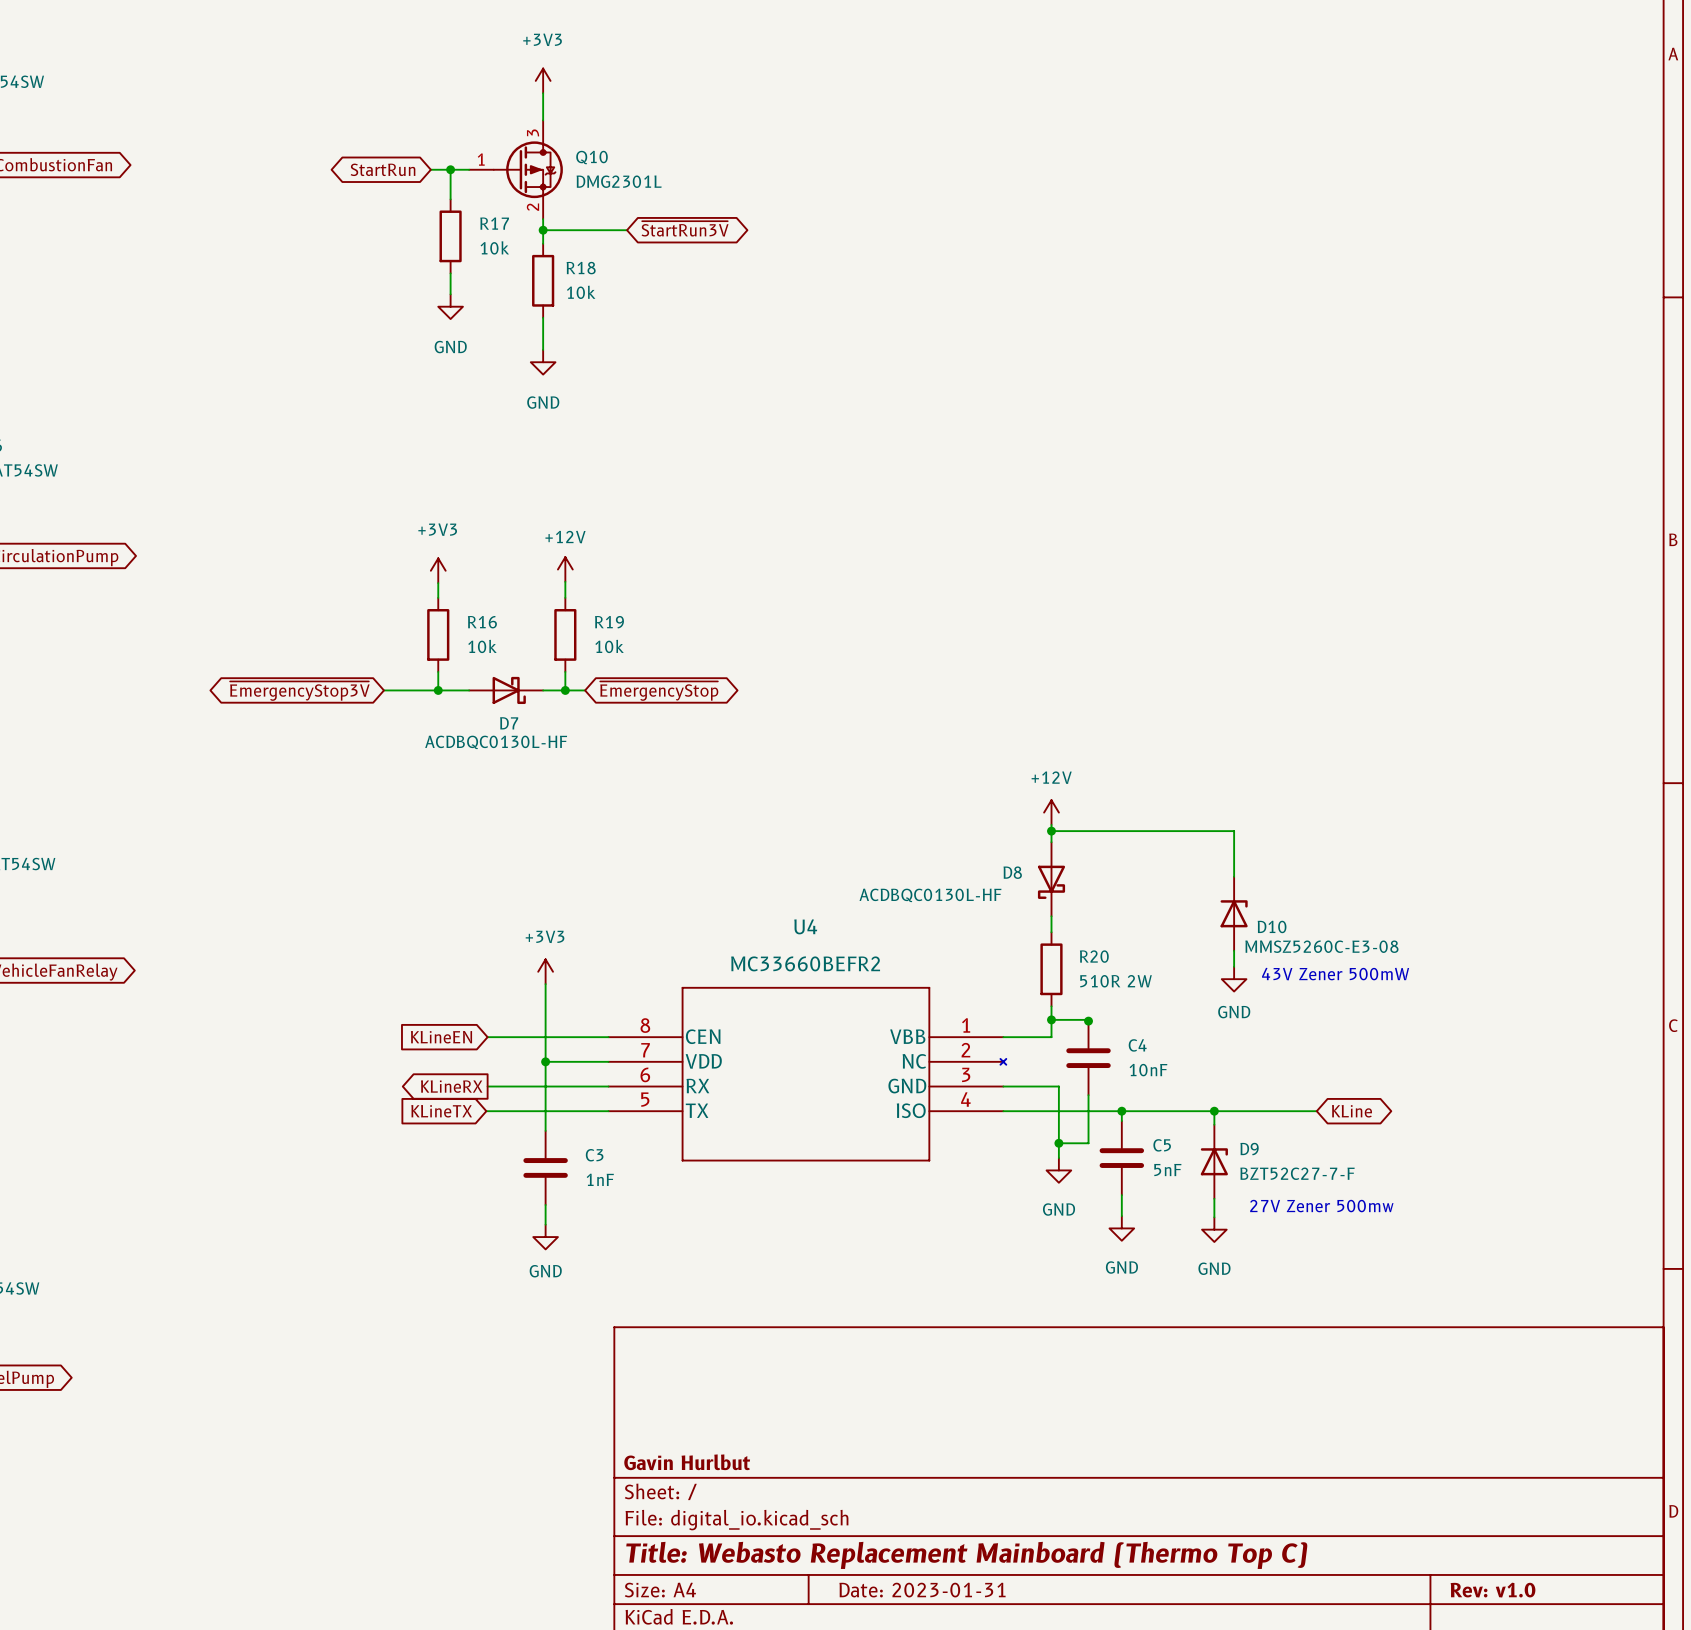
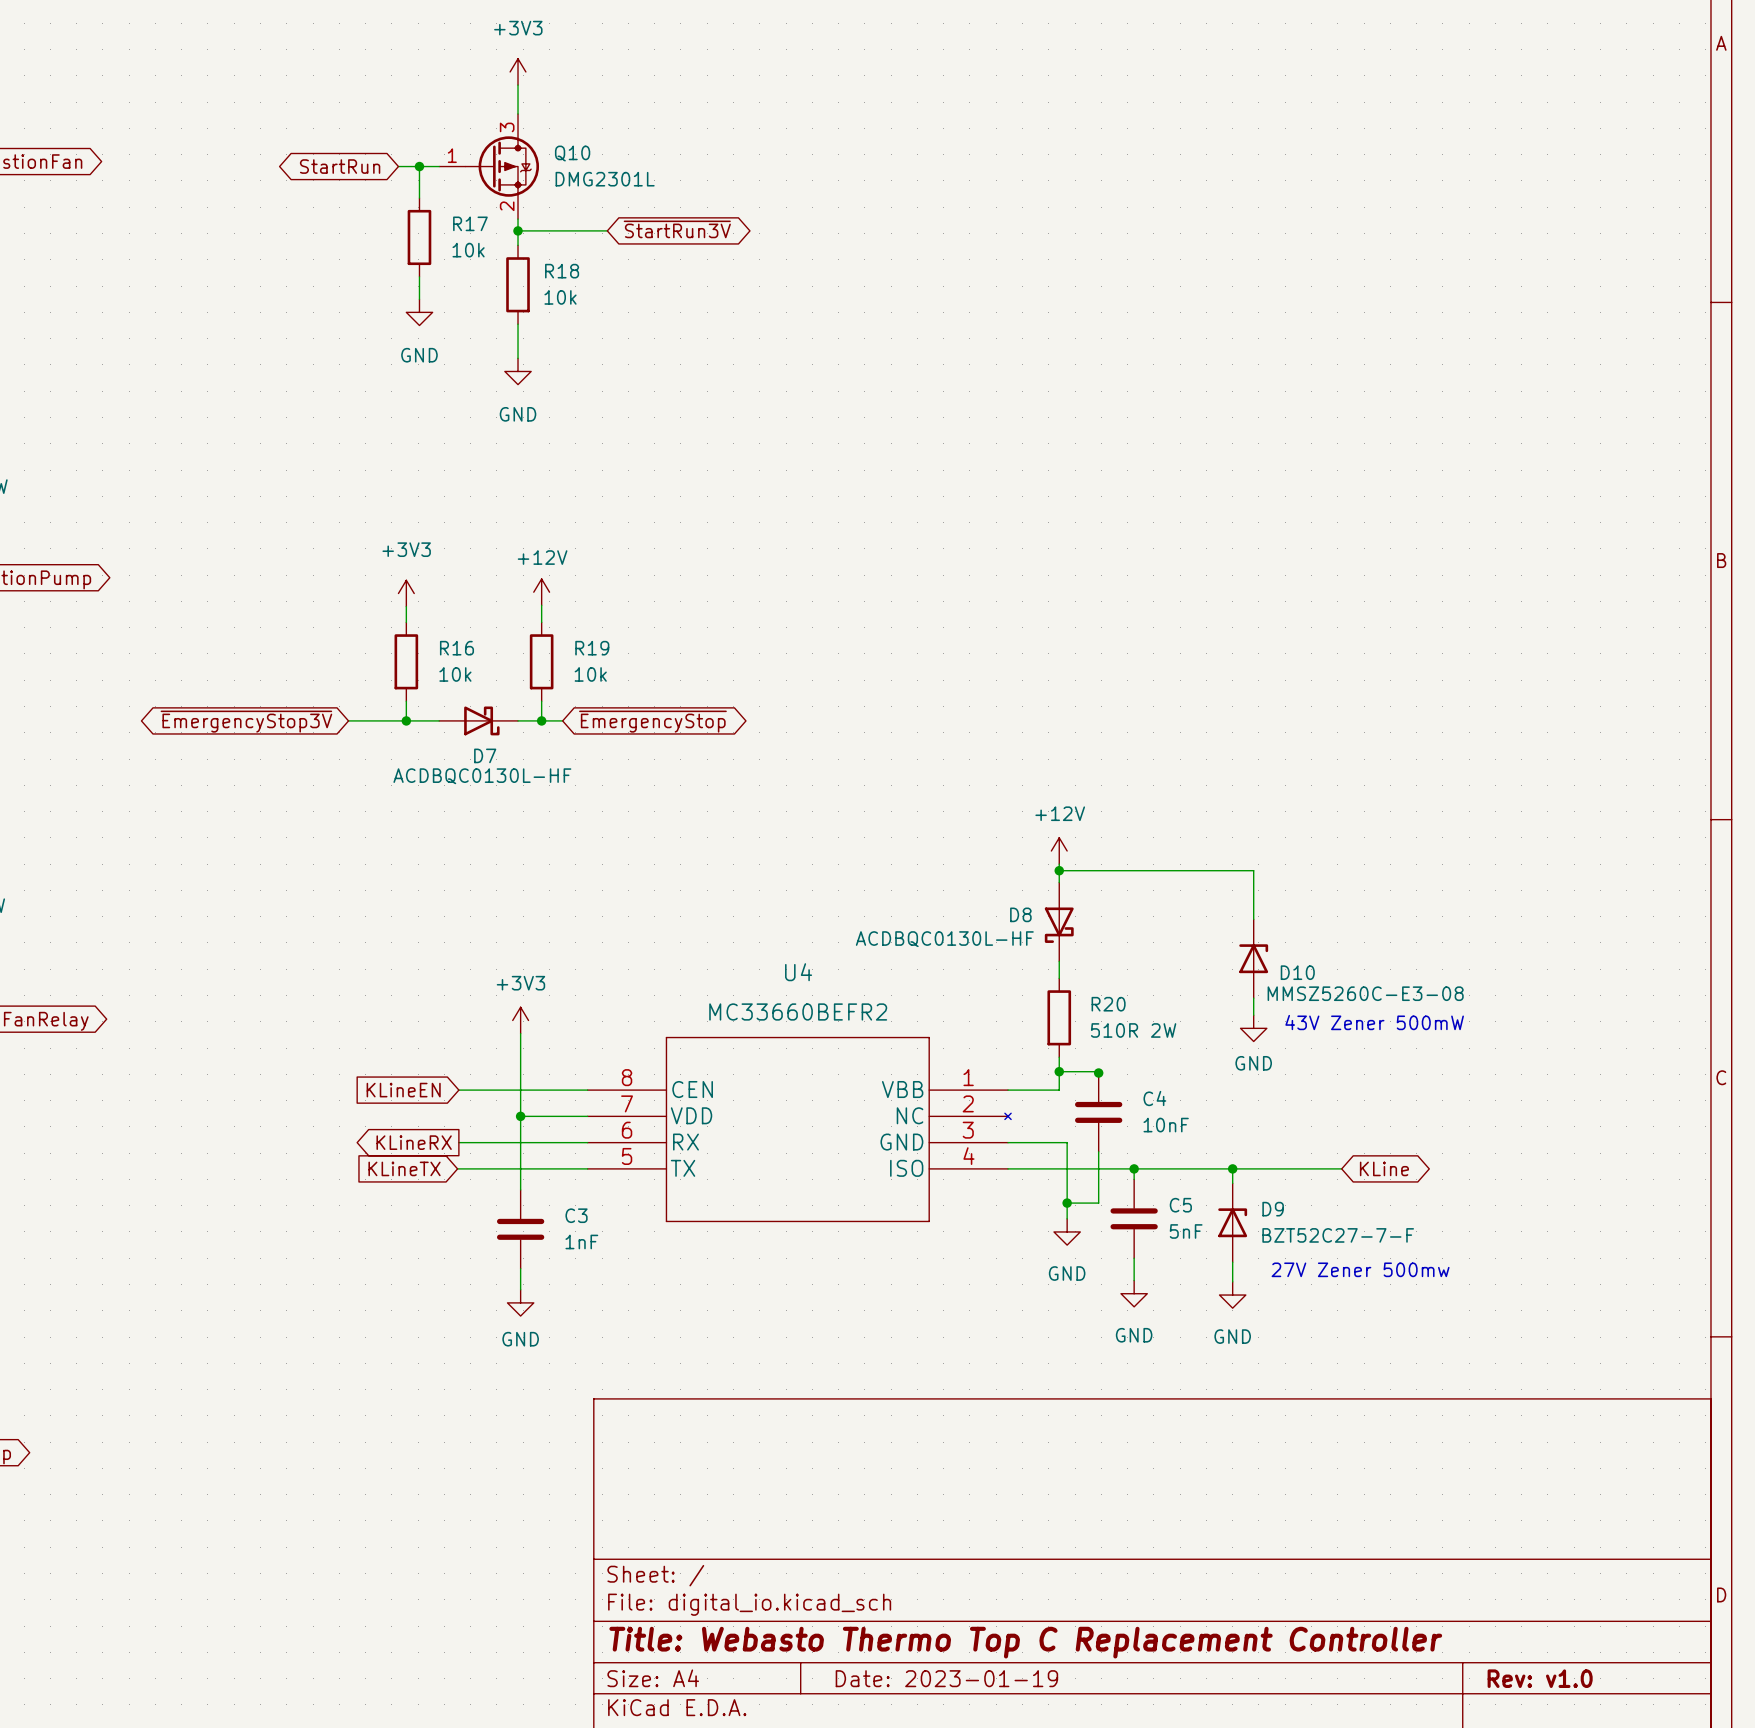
title block: Gavin Hurlbut (687, 1462) -> none
title block: Title: Webasto Replacement Mainboard (Thermo Top C) (966, 1555) -> Title: Webasto Thermo Top C Replacement Controller (1025, 1642)
title block: Date: 2023-01-31 (922, 1590) -> Date: 2023-01-19 (946, 1678)

